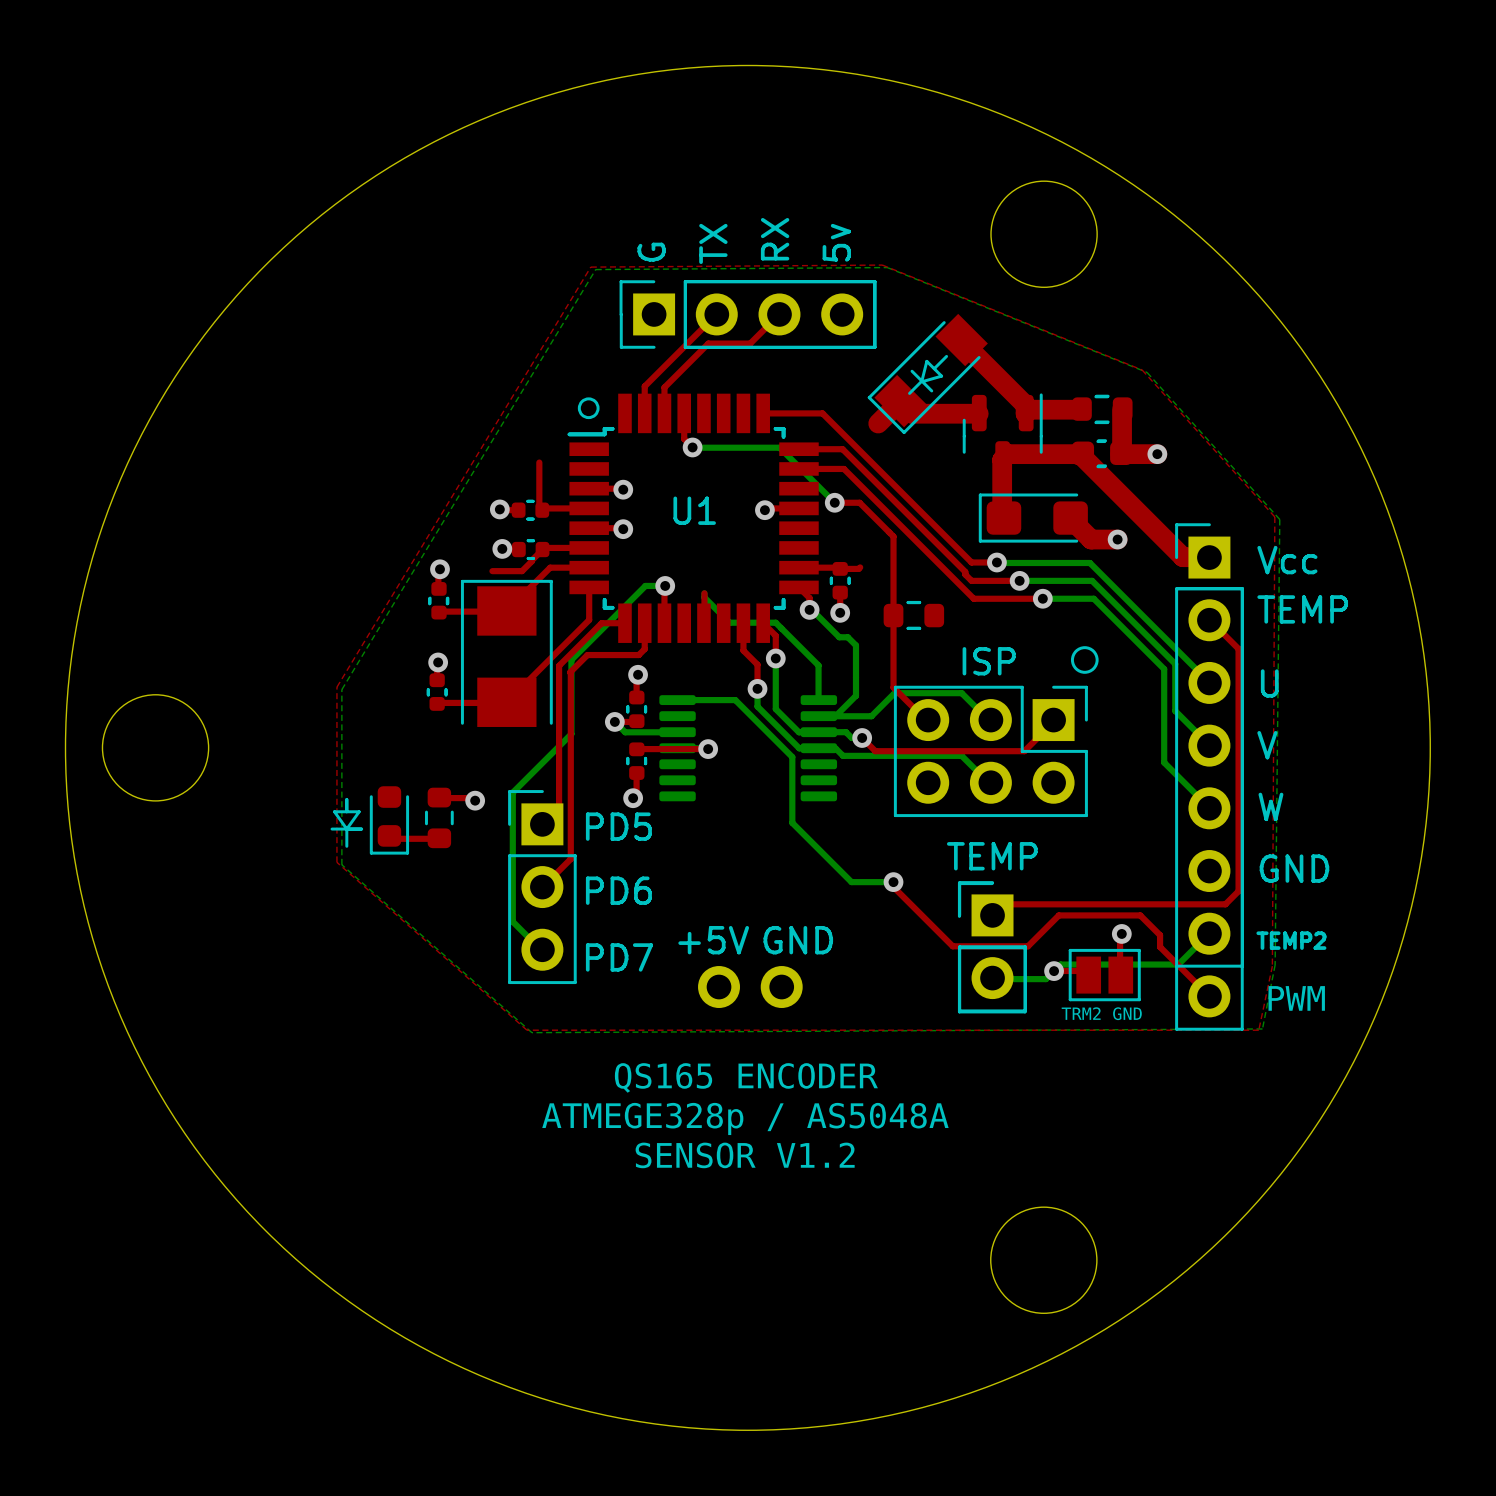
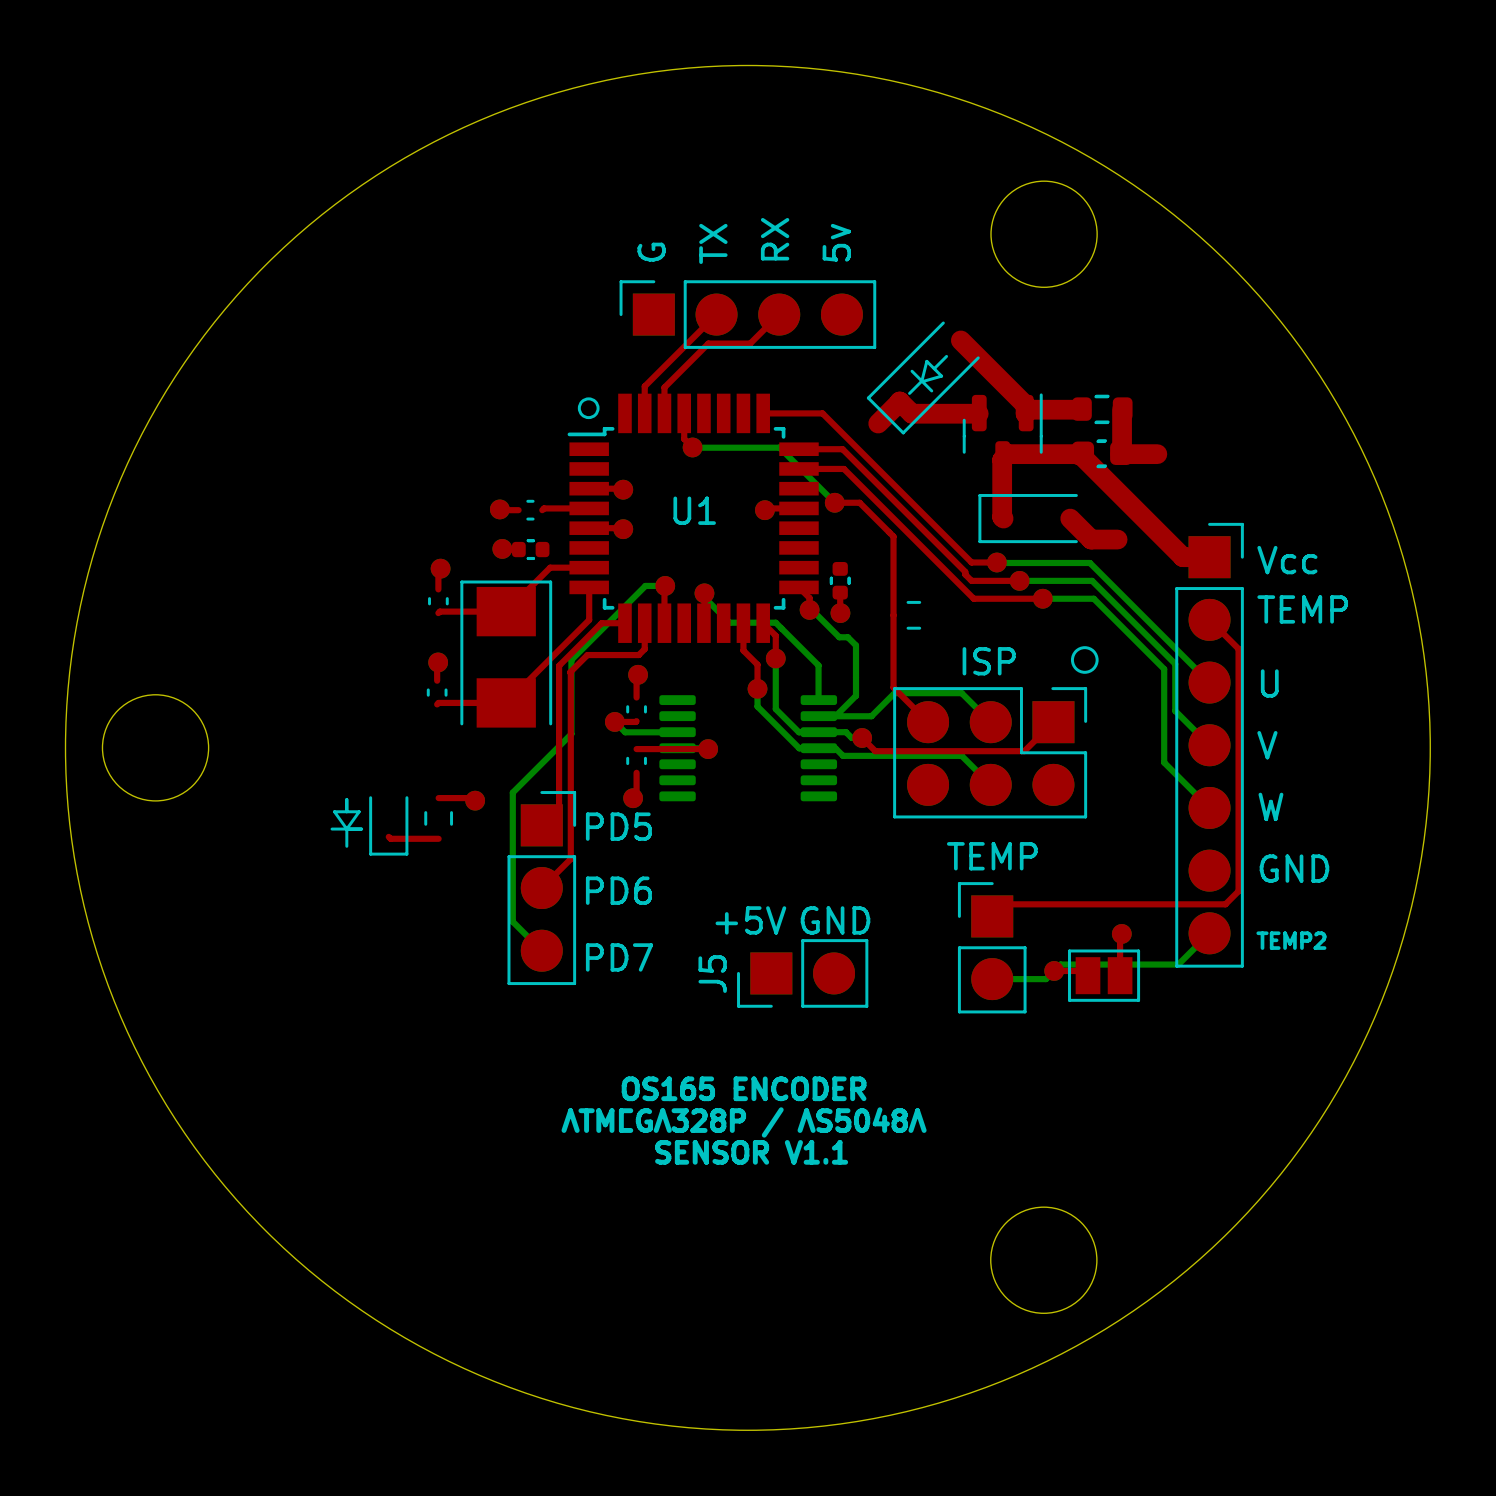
top zone outline: (882, 265) (590, 267) (336, 687) (336, 862) (526, 1030) (1258, 1030) (1272, 966) (1274, 516) (1142, 369) (882, 265) -> none
bottom zone outline: (887, 267) (595, 269) (341, 689) (341, 864) (531, 1032) (1262, 1028) (1275, 964) (1279, 519) (1147, 372) (887, 267) -> none
drawing: none -> [632, 293, 863, 336]
part: (748, 314) -> none
line: none -> (943, 322) (868, 398) (903, 432) (978, 357)
part: (927, 373) -> none
drawing: none -> [569, 393, 851, 732]
via: (692, 447) -> none
via: (1157, 454) -> none
top track: (539, 462) (539, 507) (542, 510) -> none
via: (623, 489) -> none
line: none -> (1076, 495) (979, 495) (979, 541) (1076, 541)
drawing: none -> [430, 499, 536, 637]
via: (834, 502) -> none
via: (499, 509) -> none
part: (530, 510) -> none
via: (764, 510) -> none
part: (693, 518) -> none
part: (1033, 518) -> none
line: none -> (1209, 524) (1242, 524) (1242, 557)
via: (623, 529) -> none
drawing: none -> [1188, 536, 1231, 955]
via: (1117, 539) -> none
top track: (589, 547) (544, 547) (522, 571) (492, 571) -> none
via: (502, 548) -> none
drawing: none -> [987, 552, 1053, 609]
via: (996, 562) -> none
top track: (860, 567) (798, 567) -> none
via: (439, 569) -> none
via: (1019, 580) -> none
via: (665, 585) -> none
line: none -> (1176, 588) (1176, 966)
via: (1042, 598) -> none
part: (439, 600) -> none
via: (809, 609) -> none
via: (840, 612) -> none
part: (913, 615) -> none
drawing: none -> [428, 652, 536, 728]
part: (506, 653) -> none
via: (775, 658) -> none
via: (438, 662) -> none
via: (638, 674) -> none
via: (757, 688) -> none
line: none -> (894, 688) (1021, 688) (1021, 752) (1085, 752) (1085, 816) (894, 816) (894, 688)
line: none -> (1052, 688) (1085, 688) (1085, 721)
part: (437, 692) -> none
bottom track: (677, 700) (735, 700) (792, 757) (792, 822) (851, 882) (893, 882) -> none
drawing: none -> [907, 701, 1075, 806]
part: (636, 709) -> none
via: (614, 721) -> none
line: none -> (461, 723) (461, 581) (550, 581) (550, 723)
drawing: none -> [852, 728, 873, 748]
via: (862, 737) -> none
drawing: none -> [698, 739, 719, 759]
via: (708, 749) -> none
part: (990, 751) -> none
part: (636, 761) -> none
part: (1209, 776) -> none
drawing: none -> [623, 788, 644, 809]
drawing: none -> [465, 790, 486, 811]
line: none -> (541, 792) (574, 792) (574, 825)
line: none -> (370, 797) (370, 854) (406, 854) (406, 797)
via: (633, 798) -> none
via: (475, 800) -> none
drawing: none -> [520, 804, 563, 972]
line: none -> (425, 812) (425, 824)
line: none -> (451, 812) (451, 824)
part: (439, 817) -> none
part: (389, 820) -> none
line: none -> (508, 856) (508, 983) (574, 983) (574, 856) (508, 856)
top track: (893, 882) (893, 887) (952, 946) (1028, 946) (1058, 915) (1140, 915) (1160, 935) (1160, 947) (1209, 996) -> none
via: (893, 882) -> none
part: (542, 887) -> none
drawing: none -> [971, 895, 1014, 1001]
drawing: none -> [1044, 924, 1133, 995]
line: (722, 927) (710, 927) (709, 939) (713, 937) (721, 938) (723, 941) (722, 950) (718, 952) (709, 950) -> (759, 908) (747, 908) (746, 919) (750, 917) (758, 918) (760, 922) (759, 930) (756, 932) (746, 930)
line: (730, 927) (738, 952) (747, 927) -> (767, 908) (776, 932) (784, 908)
line: (805, 927) (805, 952) (791, 927) (791, 952) -> (842, 908) (842, 932) (828, 908) (828, 932)
line: (817, 927) (826, 929) (831, 938) (828, 948) (822, 952) (817, 952) (817, 927) -> (854, 908) (863, 909) (868, 918) (866, 929) (860, 932) (854, 932) (854, 908)
line: (779, 929) (770, 929) (766, 933) (765, 941) (770, 951) (775, 952) (780, 950) (780, 941) (775, 941) -> (816, 909) (807, 909) (803, 913) (802, 922) (807, 931) (813, 932) (817, 930) (817, 922) (813, 922)
line: (689, 933) (689, 952) -> (726, 913) (726, 932)
via: (1121, 933) -> none
line: none -> (802, 940) (802, 1006) (866, 1006) (866, 940) (802, 940)
line: (680, 943) (699, 943) -> (717, 923) (736, 923)
part: (992, 946) -> none
line: none -> (1069, 950) (1069, 1000) (1138, 1000) (1138, 950) (1069, 950)
drawing: none -> [750, 952, 856, 995]
line: none -> (700, 958) (700, 969) (712, 971) (709, 967) (710, 959) (714, 956) (722, 958) (725, 961) (722, 971)
via: (1054, 971) -> none
line: none -> (738, 973) (738, 1006) (771, 1006)
part: (1104, 975) -> none
line: none -> (700, 981) (721, 982) (725, 991)
part: (750, 987) -> none
text: PWM (1296, 998) -> none
text: TRM2 GND (1101, 1013) -> none
text: QS165 ENCODER (746, 1077) -> none
line: none -> (628, 1078) (634, 1079) (637, 1085) (636, 1095) (632, 1098) (627, 1097) (624, 1092) (625, 1081) (628, 1078)
line: none -> (691, 1078) (686, 1079) (683, 1083) (682, 1087) (682, 1094) (686, 1098) (692, 1096) (693, 1090) (691, 1087) (686, 1086) (684, 1087) (683, 1088) (682, 1090)
line: none -> (711, 1078) (702, 1078) (701, 1088) (704, 1086) (710, 1087) (712, 1090) (711, 1096) (708, 1098) (701, 1096)
line: none -> (745, 1078) (736, 1078) (736, 1098) (745, 1098)
line: none -> (765, 1078) (765, 1098) (753, 1078) (753, 1098)
line: none -> (798, 1078) (803, 1079) (806, 1085) (805, 1095) (801, 1098) (796, 1097) (793, 1092) (794, 1081) (798, 1078)
line: none -> (815, 1078) (822, 1079) (826, 1087) (824, 1095) (819, 1098) (815, 1098) (815, 1078)
line: none -> (844, 1078) (834, 1078) (834, 1098) (844, 1098)
line: none -> (656, 1079) (648, 1078) (644, 1082) (646, 1087) (655, 1091) (655, 1096) (652, 1098) (644, 1097)
line: none -> (785, 1080) (777, 1079) (773, 1087) (777, 1097) (785, 1096)
line: none -> (663, 1084) (669, 1078) (669, 1098)
line: none -> (736, 1088) (742, 1088)
line: none -> (834, 1088) (841, 1088)
line: none -> (852, 1089) (860, 1089) (862, 1088) (863, 1085) (863, 1080) (852, 1078) (852, 1098)
line: none -> (857, 1089) (863, 1098)
line: none -> (663, 1098) (674, 1098)
line: none -> (781, 1109) (764, 1135)
line: none -> (879, 1109) (875, 1123) (887, 1123)
line: none -> (580, 1110) (592, 1110)
line: none -> (586, 1110) (586, 1130)
line: none -> (630, 1110) (621, 1110) (621, 1130) (630, 1130)
line: none -> (674, 1110) (686, 1110) (679, 1118) (685, 1120) (685, 1128) (682, 1130) (674, 1128)
line: none -> (716, 1110) (720, 1110) (723, 1114) (720, 1119) (722, 1121) (723, 1126) (720, 1130) (714, 1129) (712, 1126) (713, 1121) (716, 1119) (712, 1114) (716, 1110)
line: none -> (847, 1110) (838, 1110) (837, 1120) (840, 1118) (847, 1119) (848, 1121) (847, 1128) (845, 1130) (837, 1128)
line: none -> (861, 1110) (865, 1112) (867, 1118) (866, 1126) (863, 1130) (858, 1128) (856, 1122) (857, 1114) (861, 1110)
line: none -> (897, 1110) (901, 1110) (905, 1114) (901, 1119) (904, 1121) (905, 1126) (901, 1130) (895, 1129) (894, 1126) (894, 1121) (897, 1119) (894, 1114) (897, 1110)
line: none -> (649, 1111) (642, 1111) (639, 1115) (638, 1121) (642, 1129) (650, 1128) (650, 1121) (646, 1121)
line: none -> (830, 1111) (822, 1110) (818, 1114) (820, 1119) (829, 1122) (829, 1128) (826, 1130) (818, 1129)
line: none -> (693, 1112) (701, 1110) (705, 1116) (692, 1130) (705, 1130)
line: none -> (884, 1117) (884, 1130)
text: ATMEGE328p / AS5048A (745, 1118) -> none
line: none -> (732, 1121) (739, 1121) (741, 1120) (743, 1117) (742, 1112) (732, 1110) (732, 1130)
line: none -> (564, 1130) (570, 1110) (577, 1130)
line: none -> (598, 1130) (598, 1110) (605, 1124) (611, 1110) (611, 1130)
line: none -> (656, 1130) (662, 1110) (669, 1130)
line: none -> (800, 1130) (806, 1110) (813, 1130)
line: none -> (910, 1130) (917, 1110) (924, 1130)
line: none -> (686, 1142) (677, 1142) (677, 1162) (686, 1162)
line: none -> (706, 1142) (706, 1162) (695, 1142) (695, 1162)
line: none -> (738, 1142) (744, 1143) (746, 1149) (745, 1159) (742, 1162) (736, 1161) (733, 1155) (734, 1145) (738, 1142)
line: none -> (787, 1142) (793, 1162) (800, 1142)
line: none -> (668, 1143) (661, 1142) (658, 1144) (658, 1150) (666, 1153) (668, 1158) (665, 1162) (657, 1161)
line: none -> (726, 1143) (718, 1142) (715, 1144) (715, 1150) (724, 1153) (726, 1158) (722, 1162) (714, 1161)
line: none -> (806, 1148) (811, 1142) (811, 1162)
line: none -> (834, 1148) (839, 1142) (839, 1162)
line: none -> (677, 1151) (683, 1151)
line: none -> (755, 1152) (762, 1152) (764, 1151) (766, 1149) (765, 1144) (755, 1142) (755, 1162)
line: none -> (760, 1152) (766, 1162)
text: SENSOR V1.2 (745, 1155) -> none
line: none -> (825, 1160) (825, 1162)
line: none -> (806, 1162) (817, 1162)
line: none -> (834, 1162) (845, 1162)

